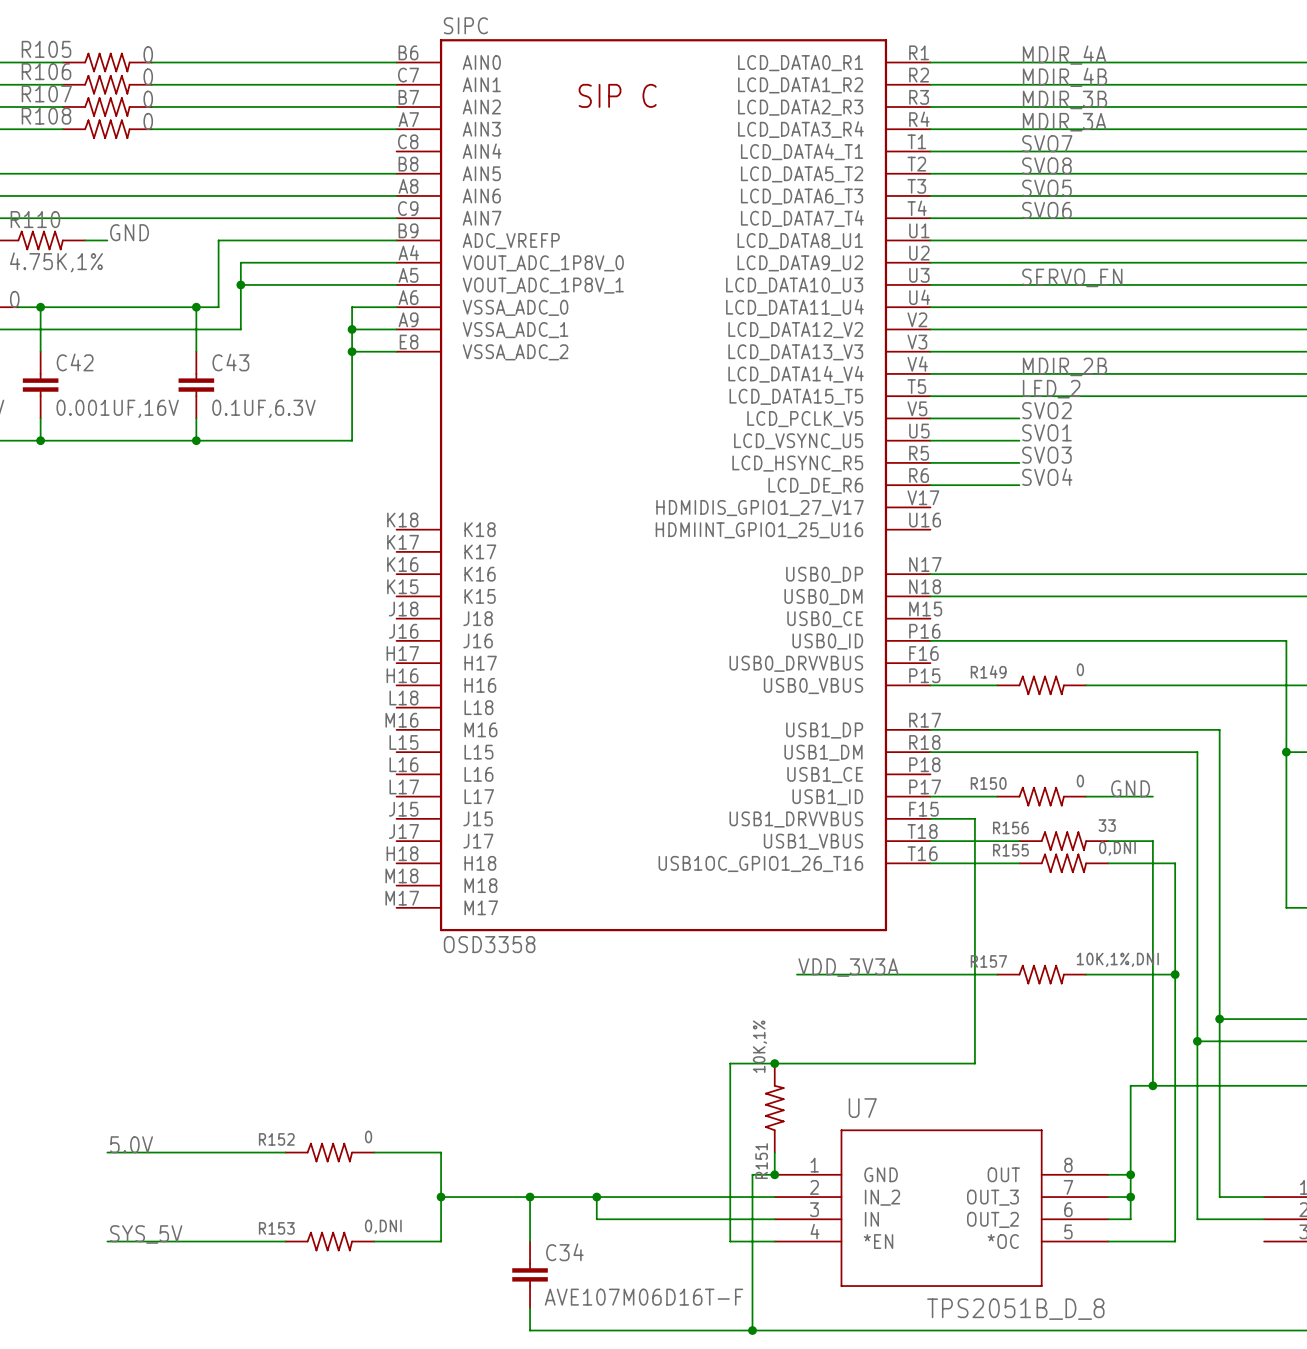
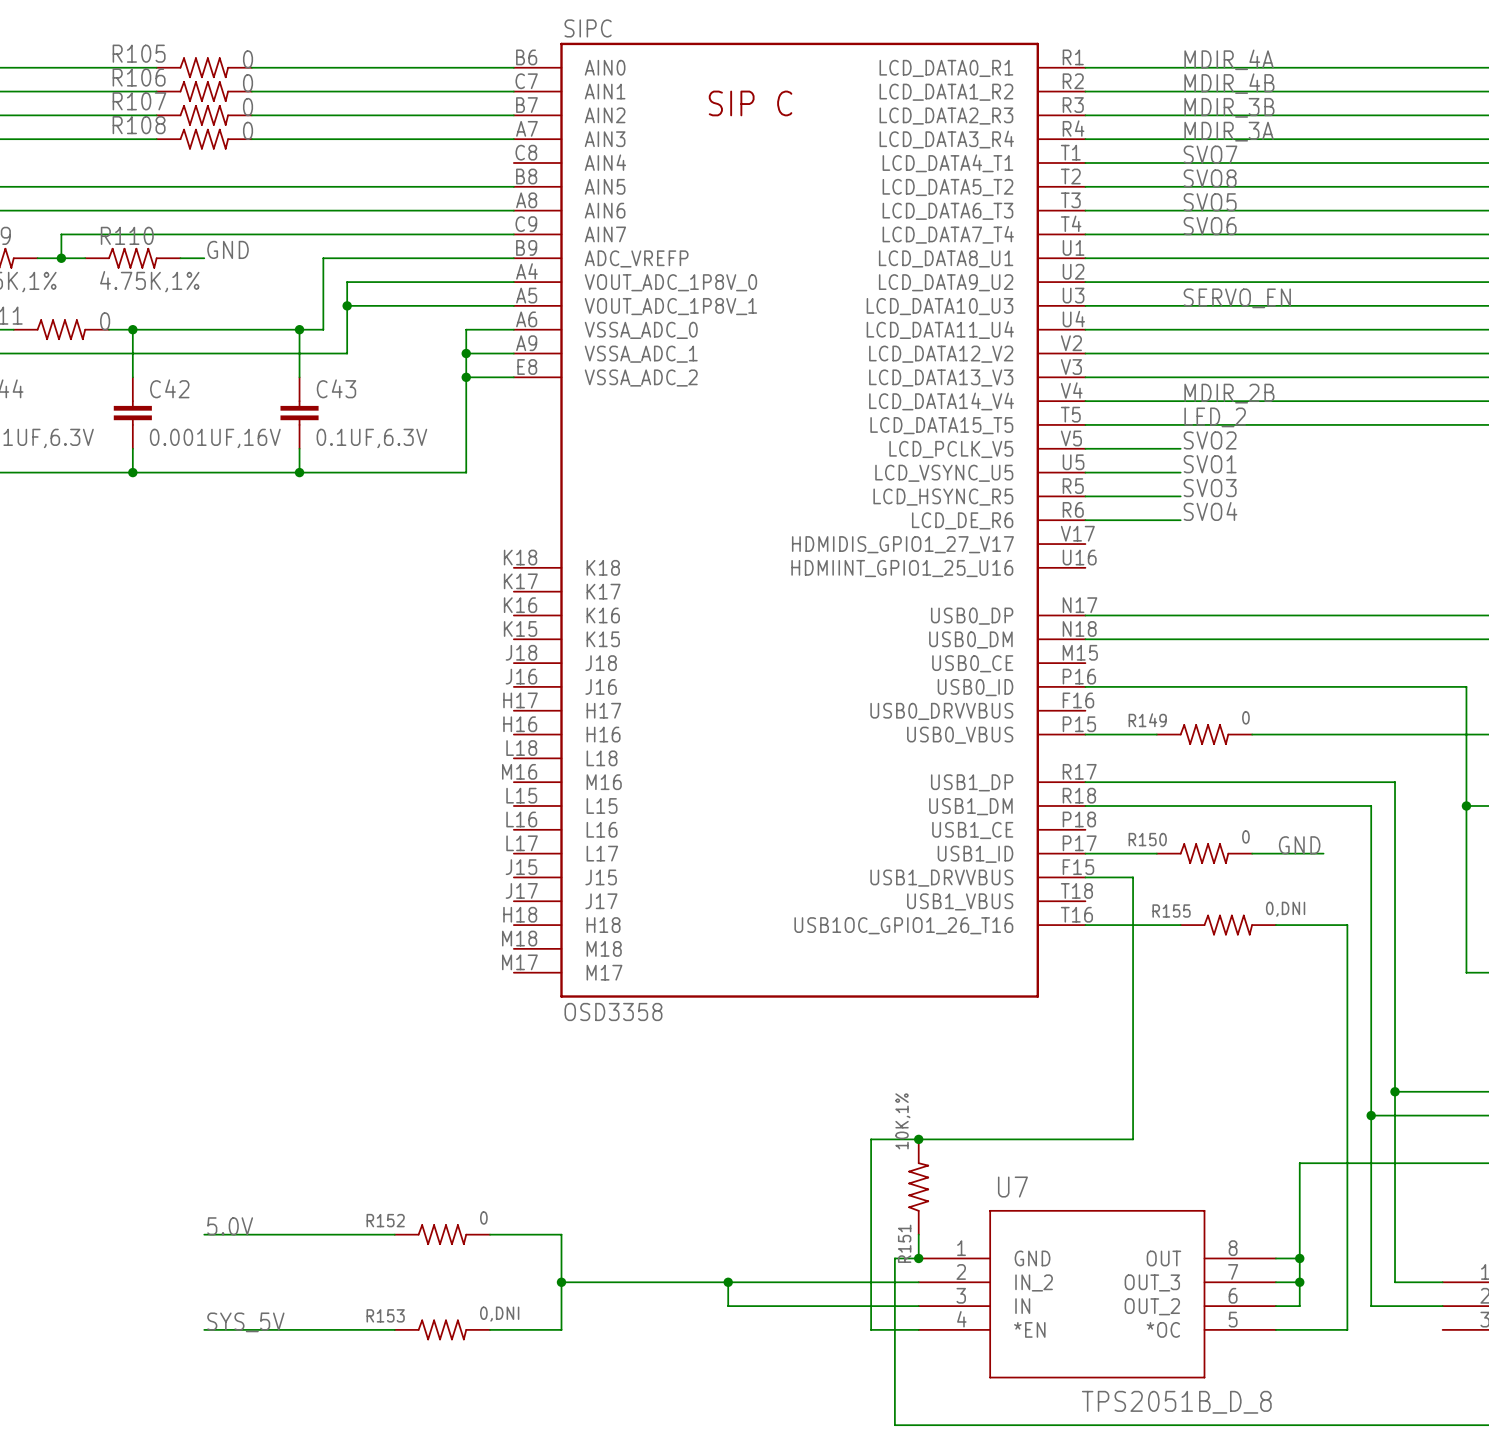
wire: (930, 841) (1019, 841) -> none
R156: 33 (1063, 841) -> none
wire: (1108, 841) (1152, 841) (1152, 1085) -> none
label: VDD_3V3A (848, 967) -> none
wire: (796, 974) (997, 974) -> none
R157: 10K,1%,DNI (1041, 974) -> none
wire: (1086, 974) (1175, 974) -> none
junction: (1175, 974) -> none
junction: (1152, 1085) -> none
wire: (530, 1197) (530, 1241) -> none
junction: (530, 1197) -> none
part: AVE107M06D16T-F (530, 1274) -> none
wire: (530, 1308) (530, 1330) (752, 1330) -> none
junction: (752, 1330) -> none

